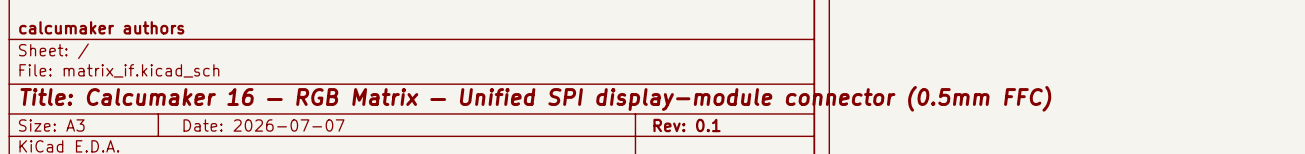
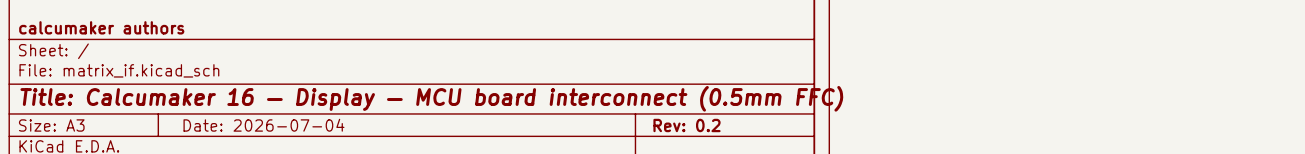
title block: Title: Calcumaker 16 — RGB Matrix — Unified SPI display-module connector (0.5mm FFC) (535, 98) -> Title: Calcumaker 16 — Display — MCU board interconnect (0.5mm FFC) (431, 98)
title block: Date: 2026-07-07 (263, 125) -> Date: 2026-07-04 (263, 125)
title block: Rev: 0.1 (686, 125) -> Rev: 0.2 (686, 125)

